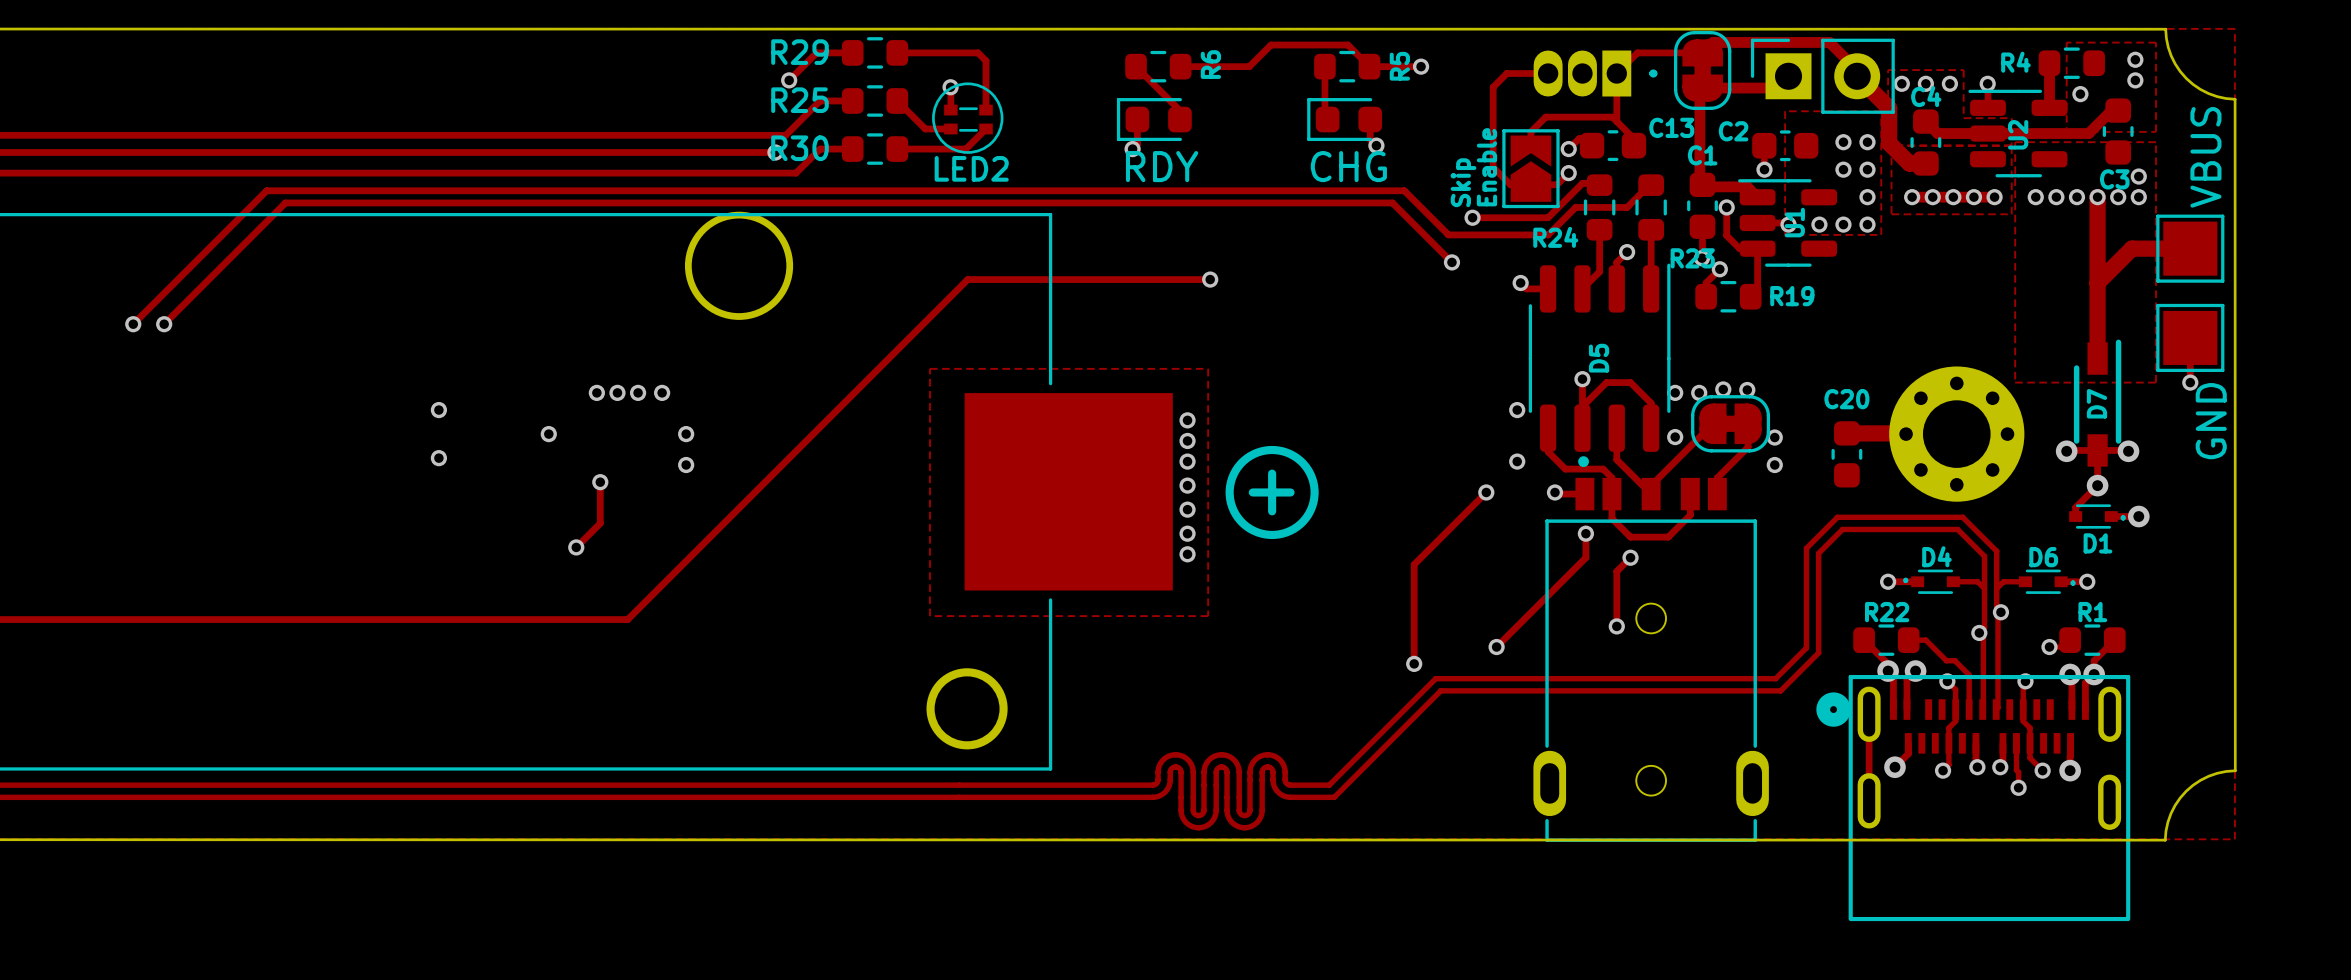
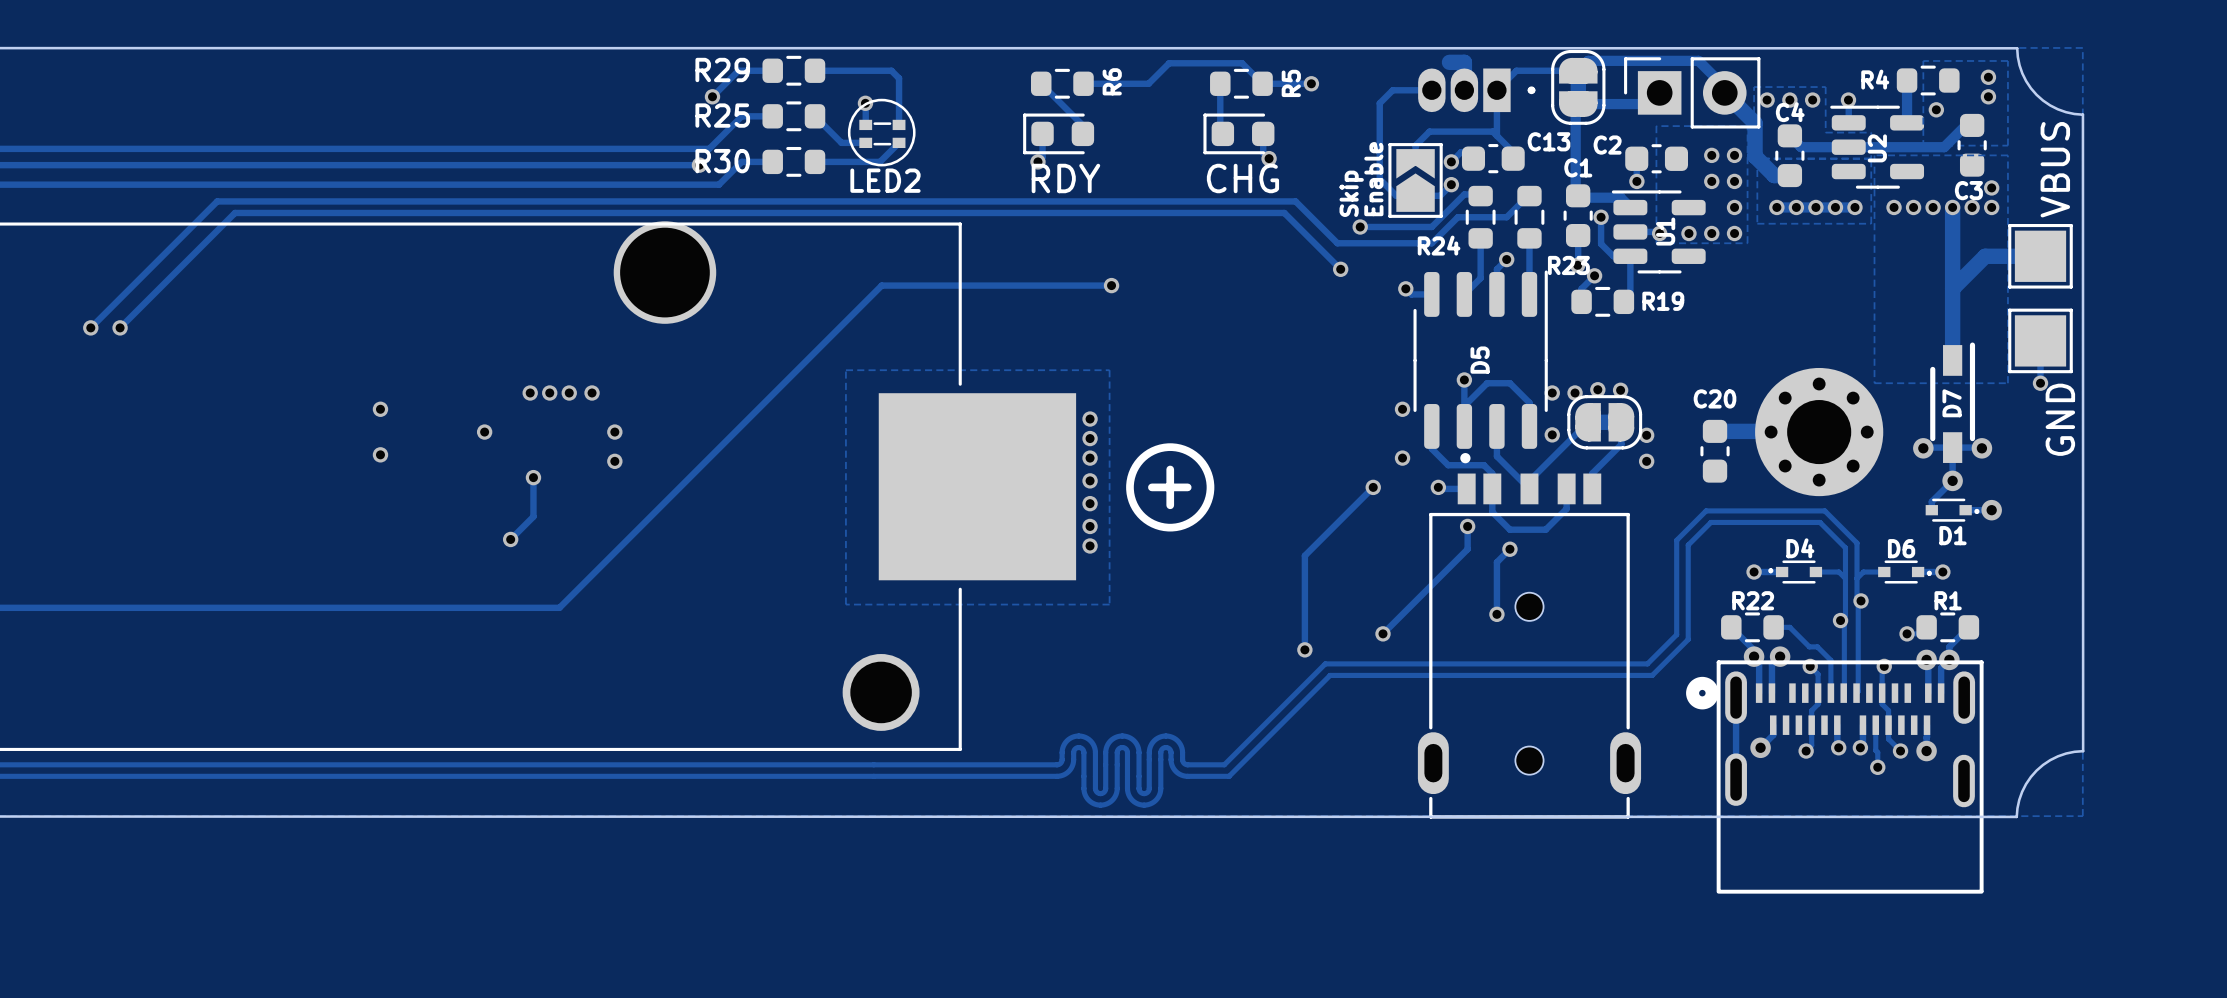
track: none -> (1449, 62) (1464, 62) (1464, 90)

